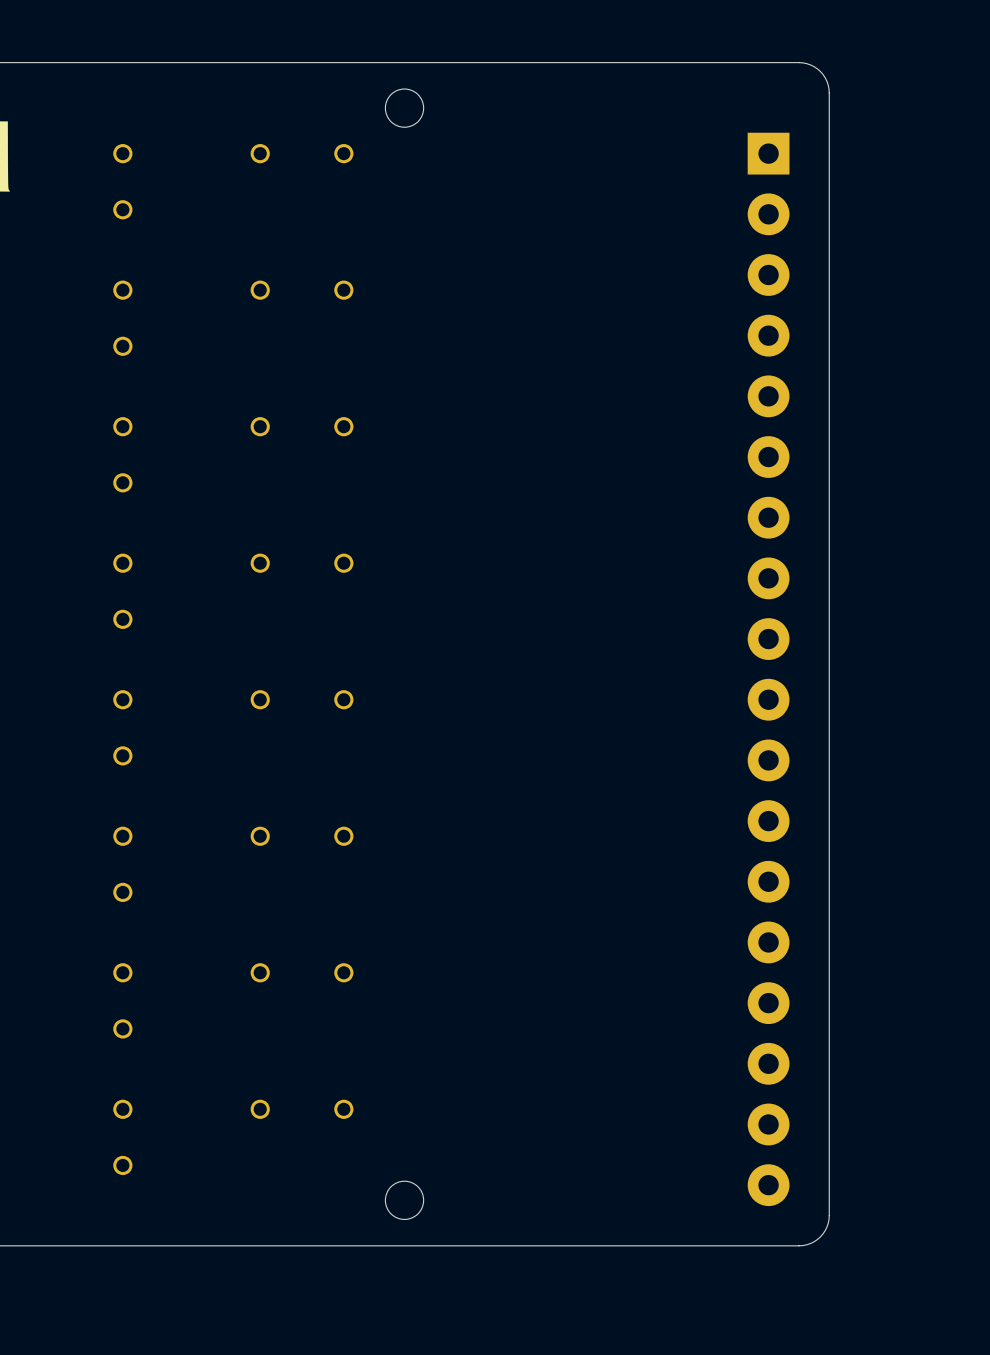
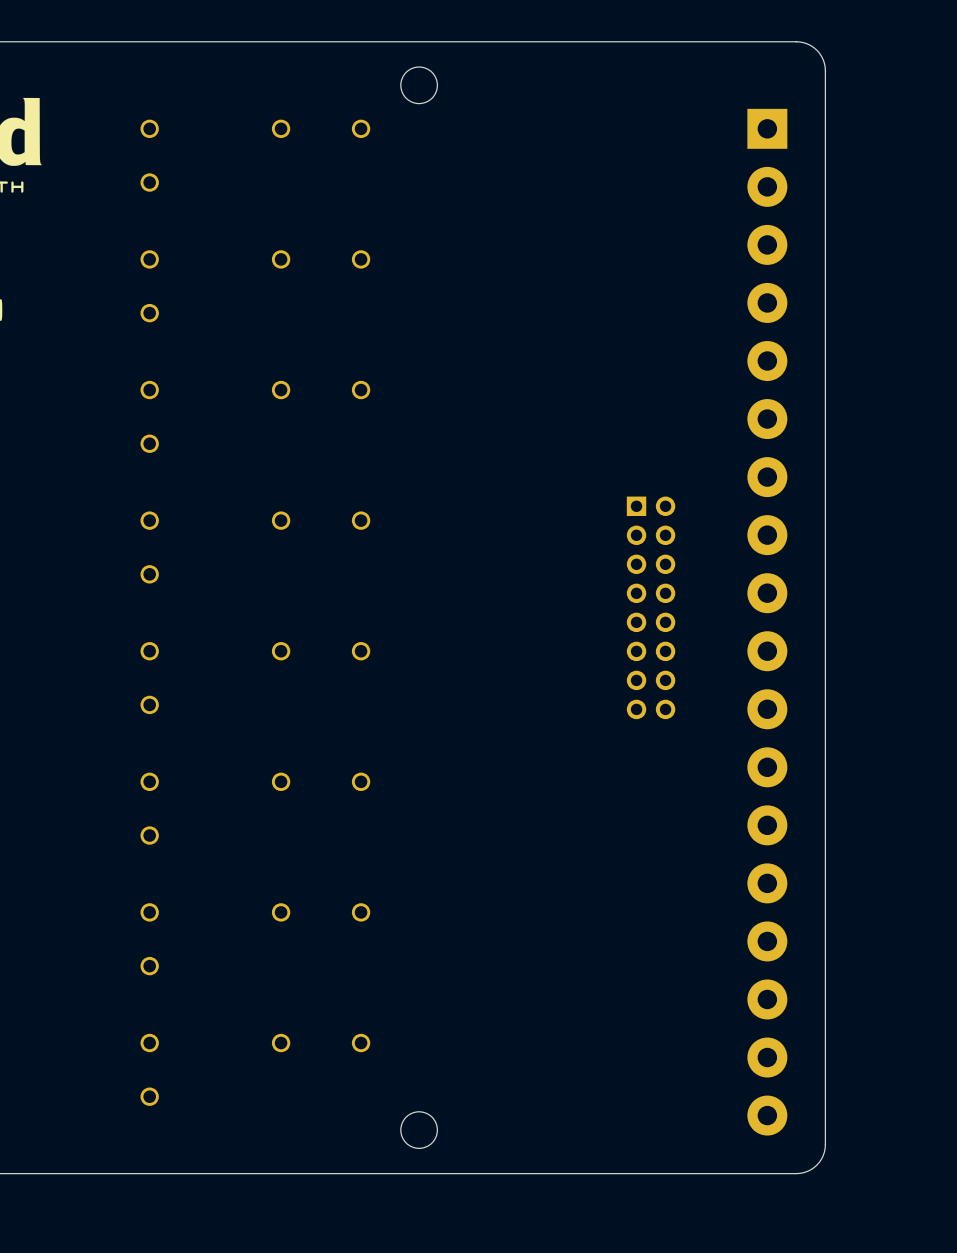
part: none -> (651, 607)

